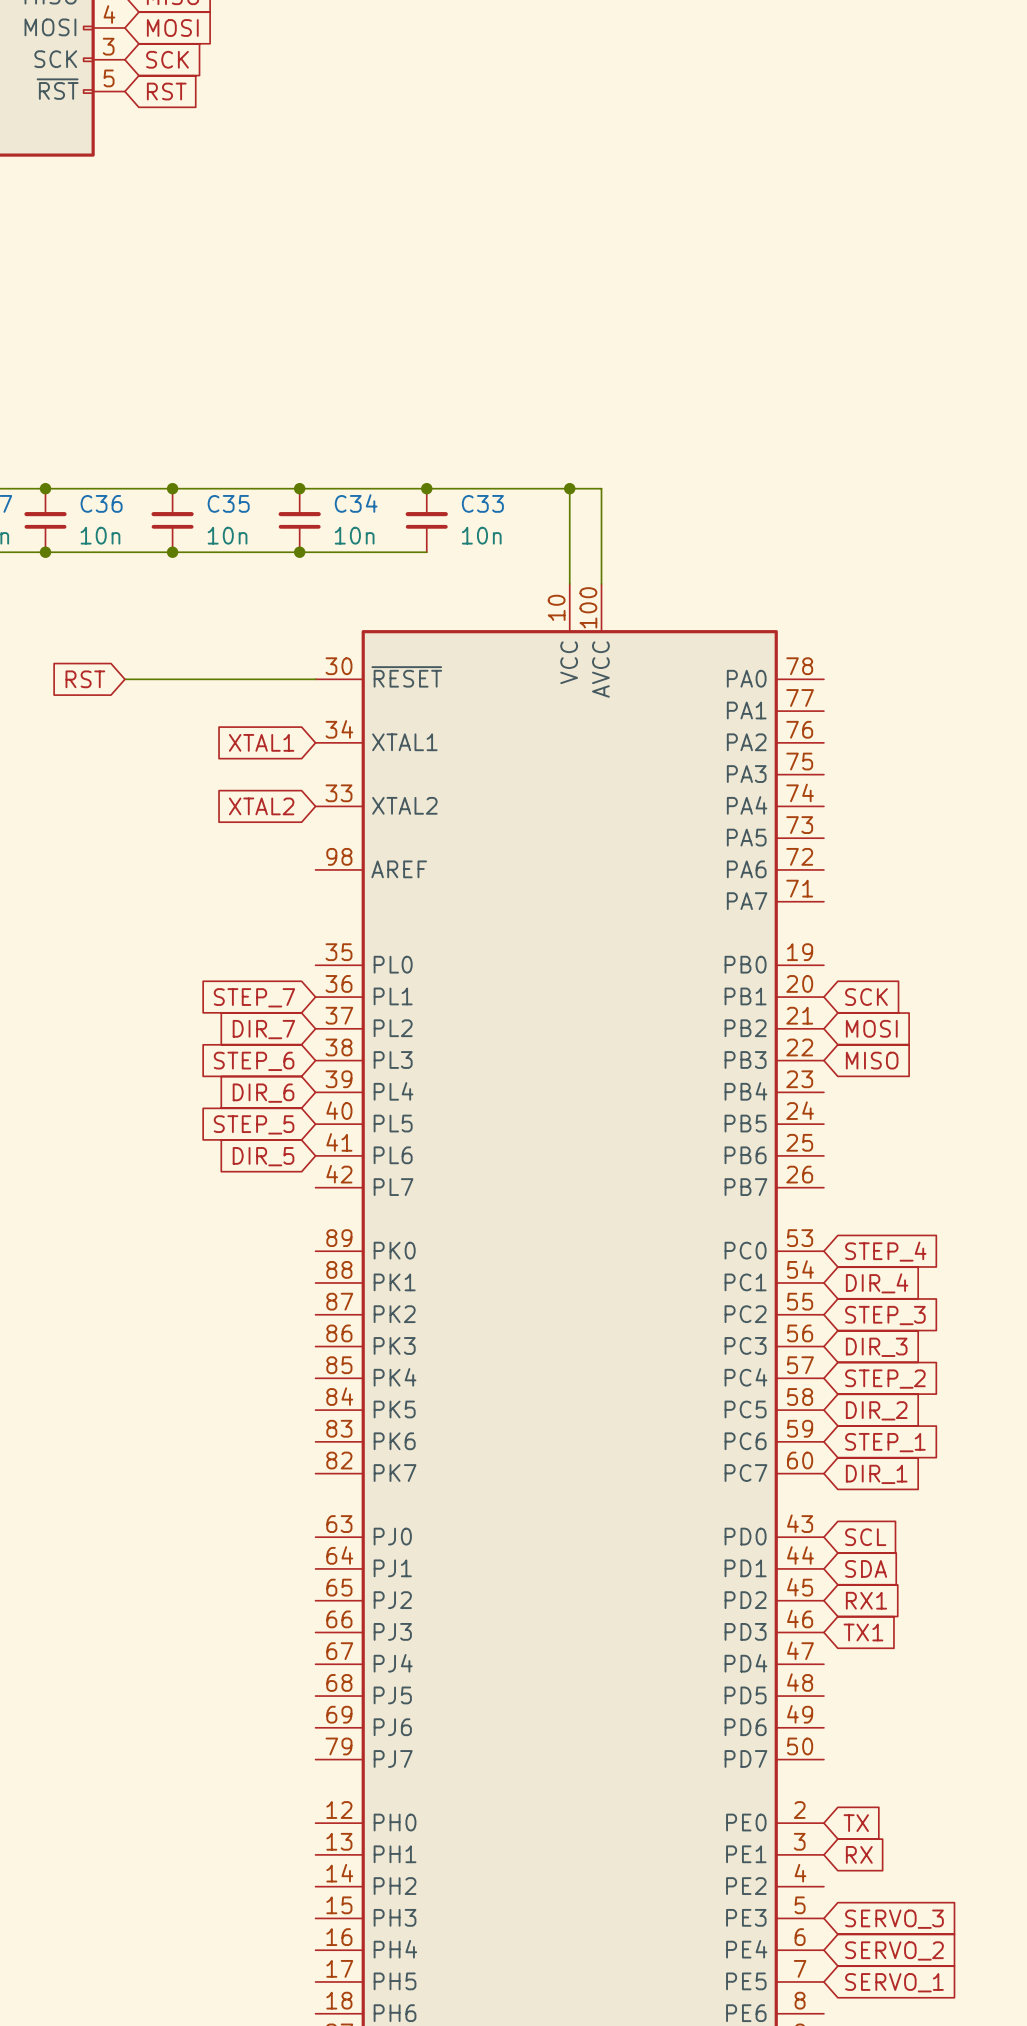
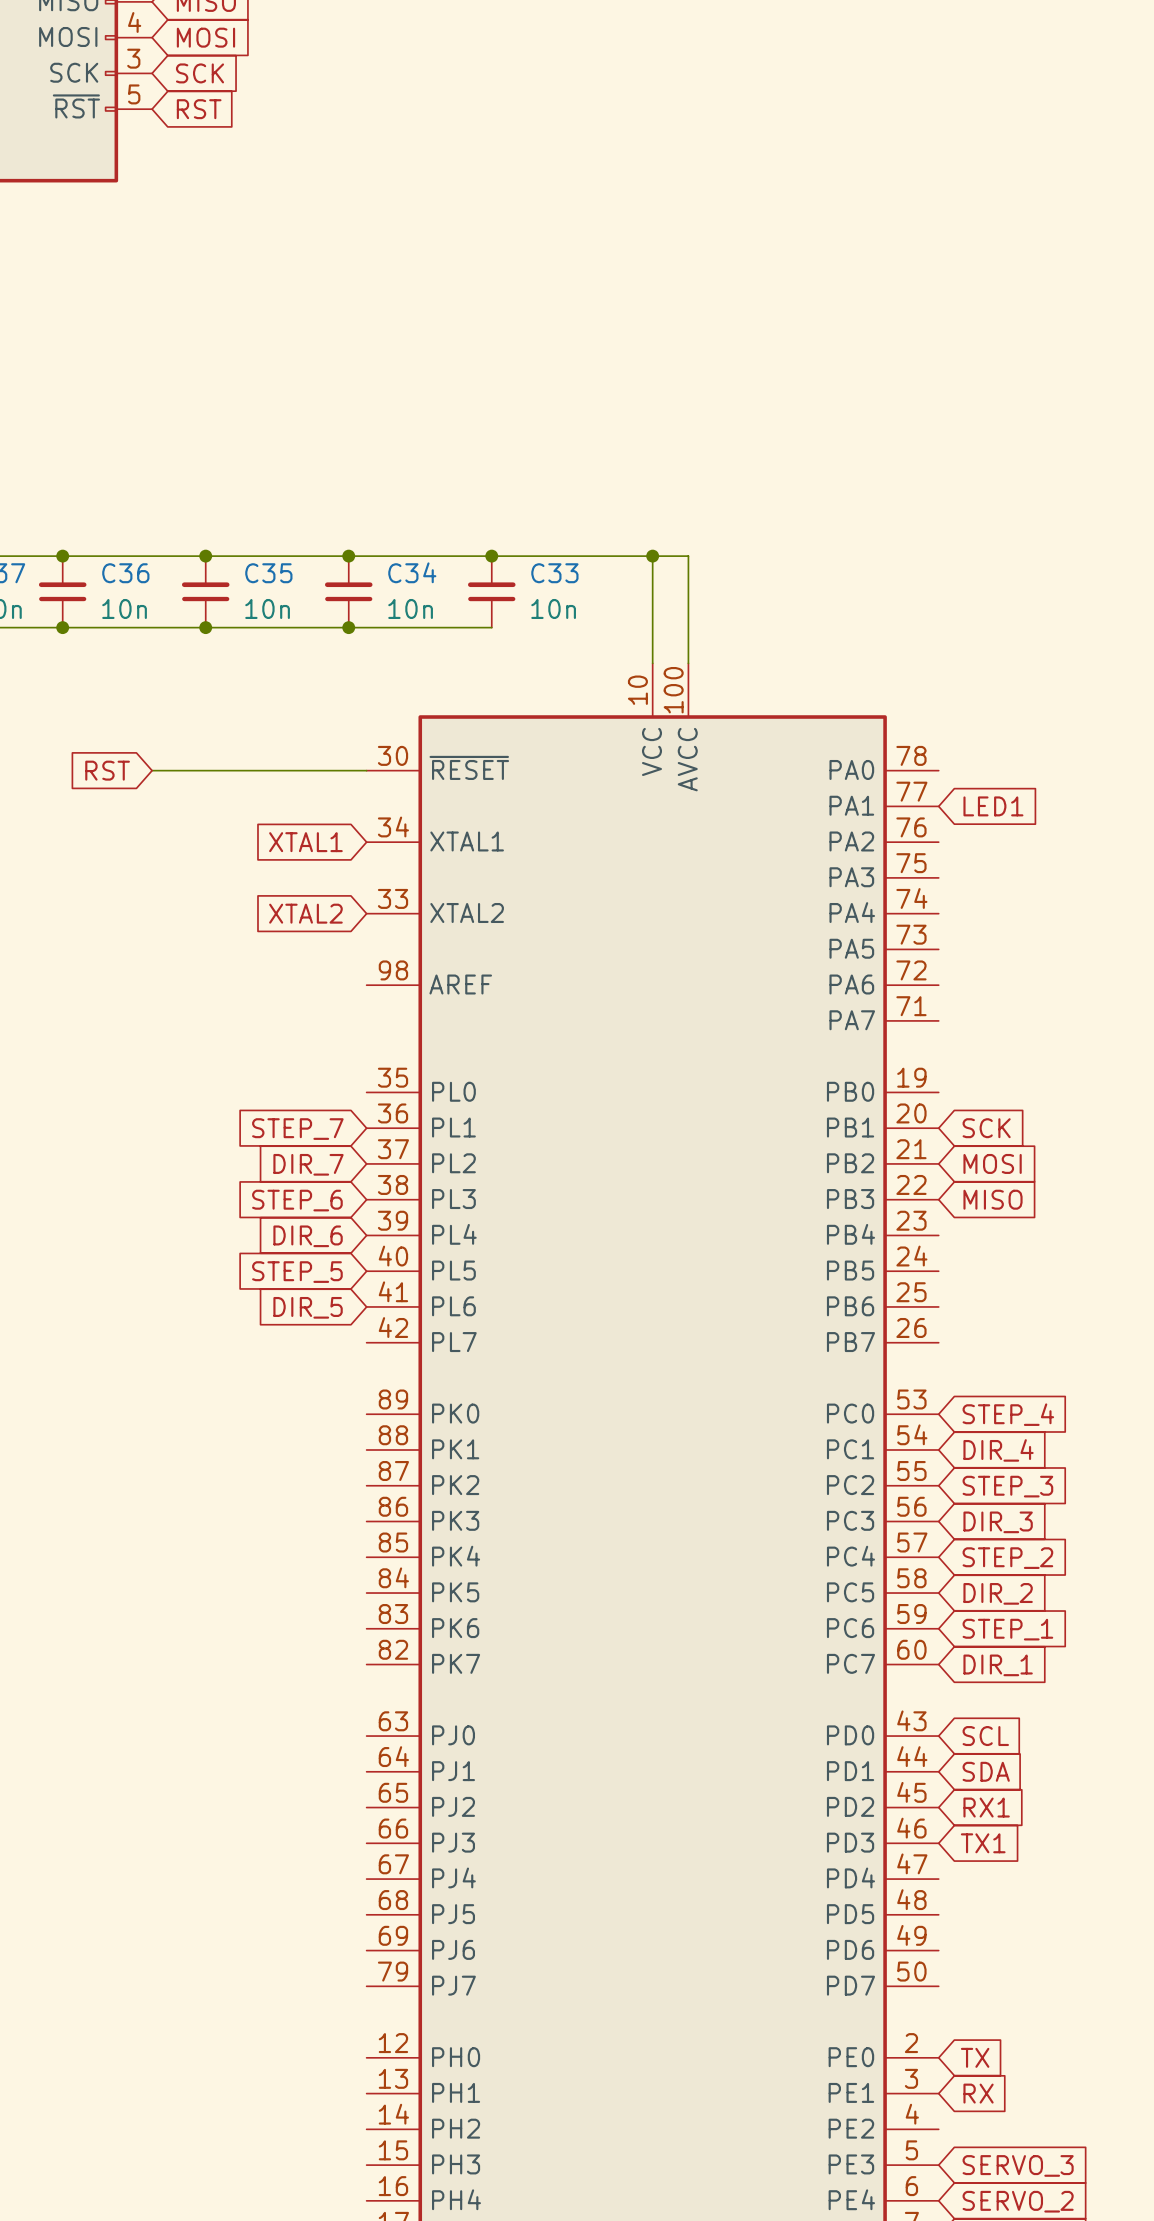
global label: none -> LED1 (993, 806)

